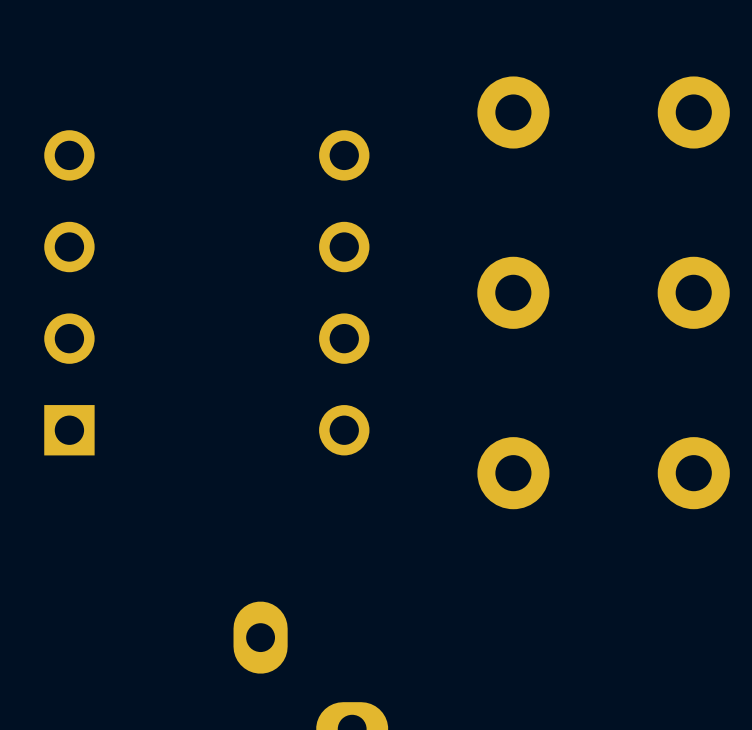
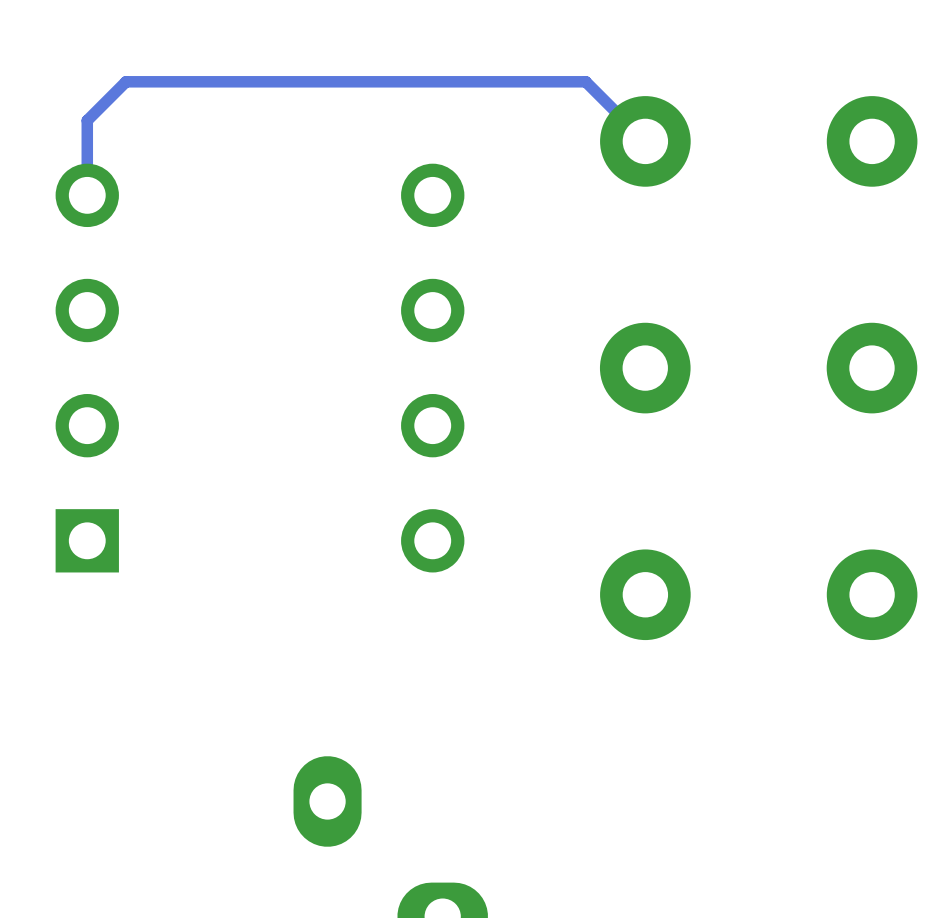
track: none -> (645, 141) (585, 81) (126, 81) (87, 120) (87, 195)

